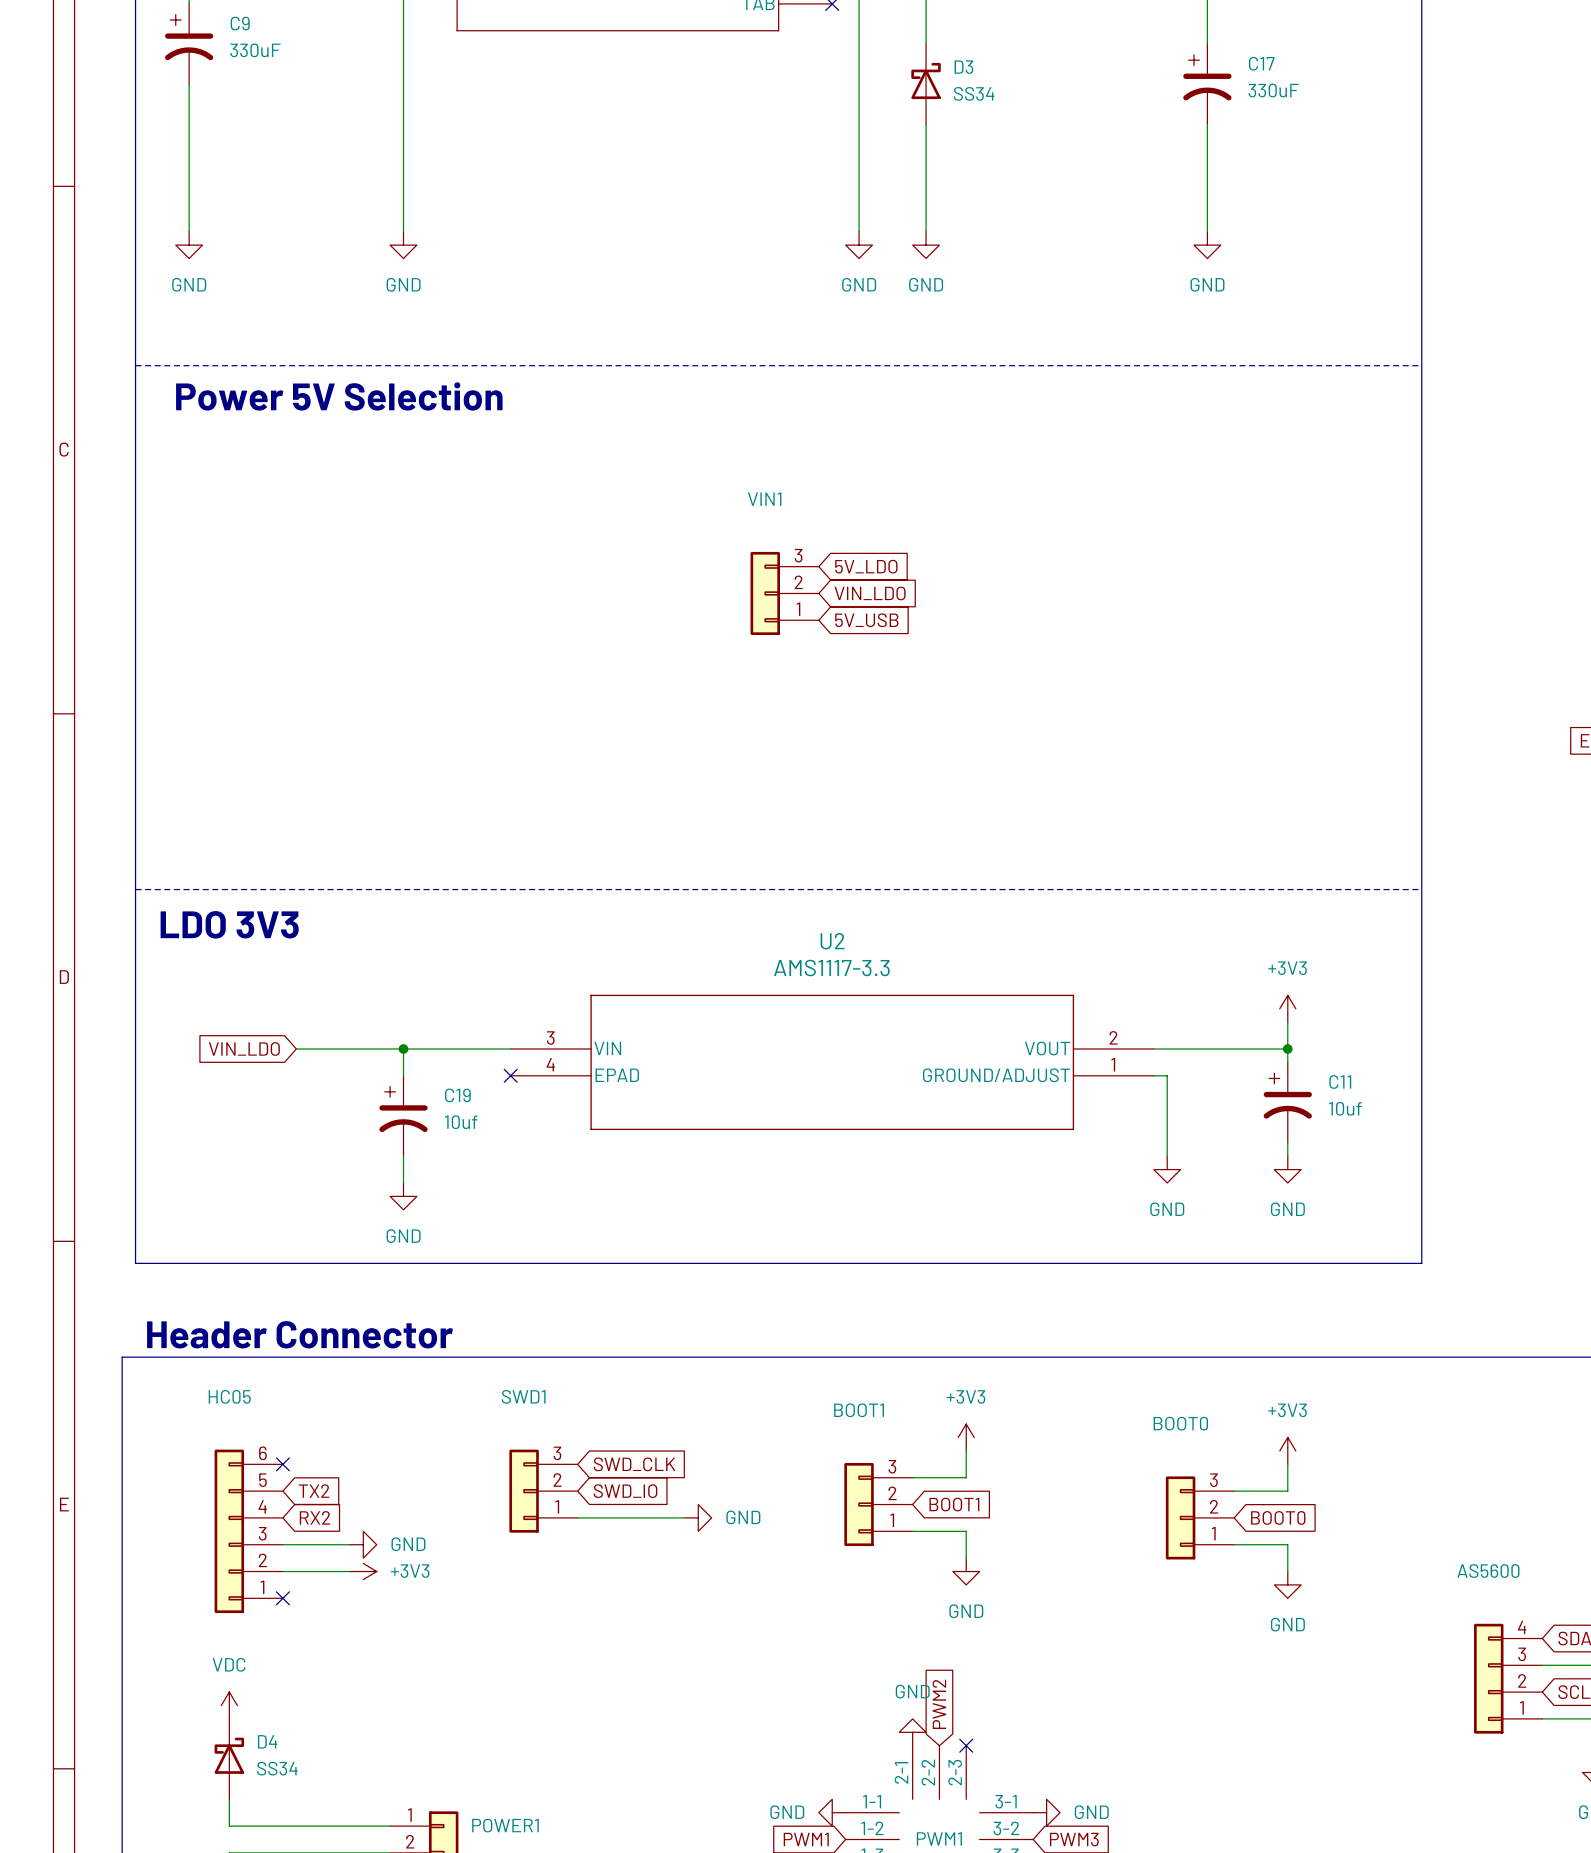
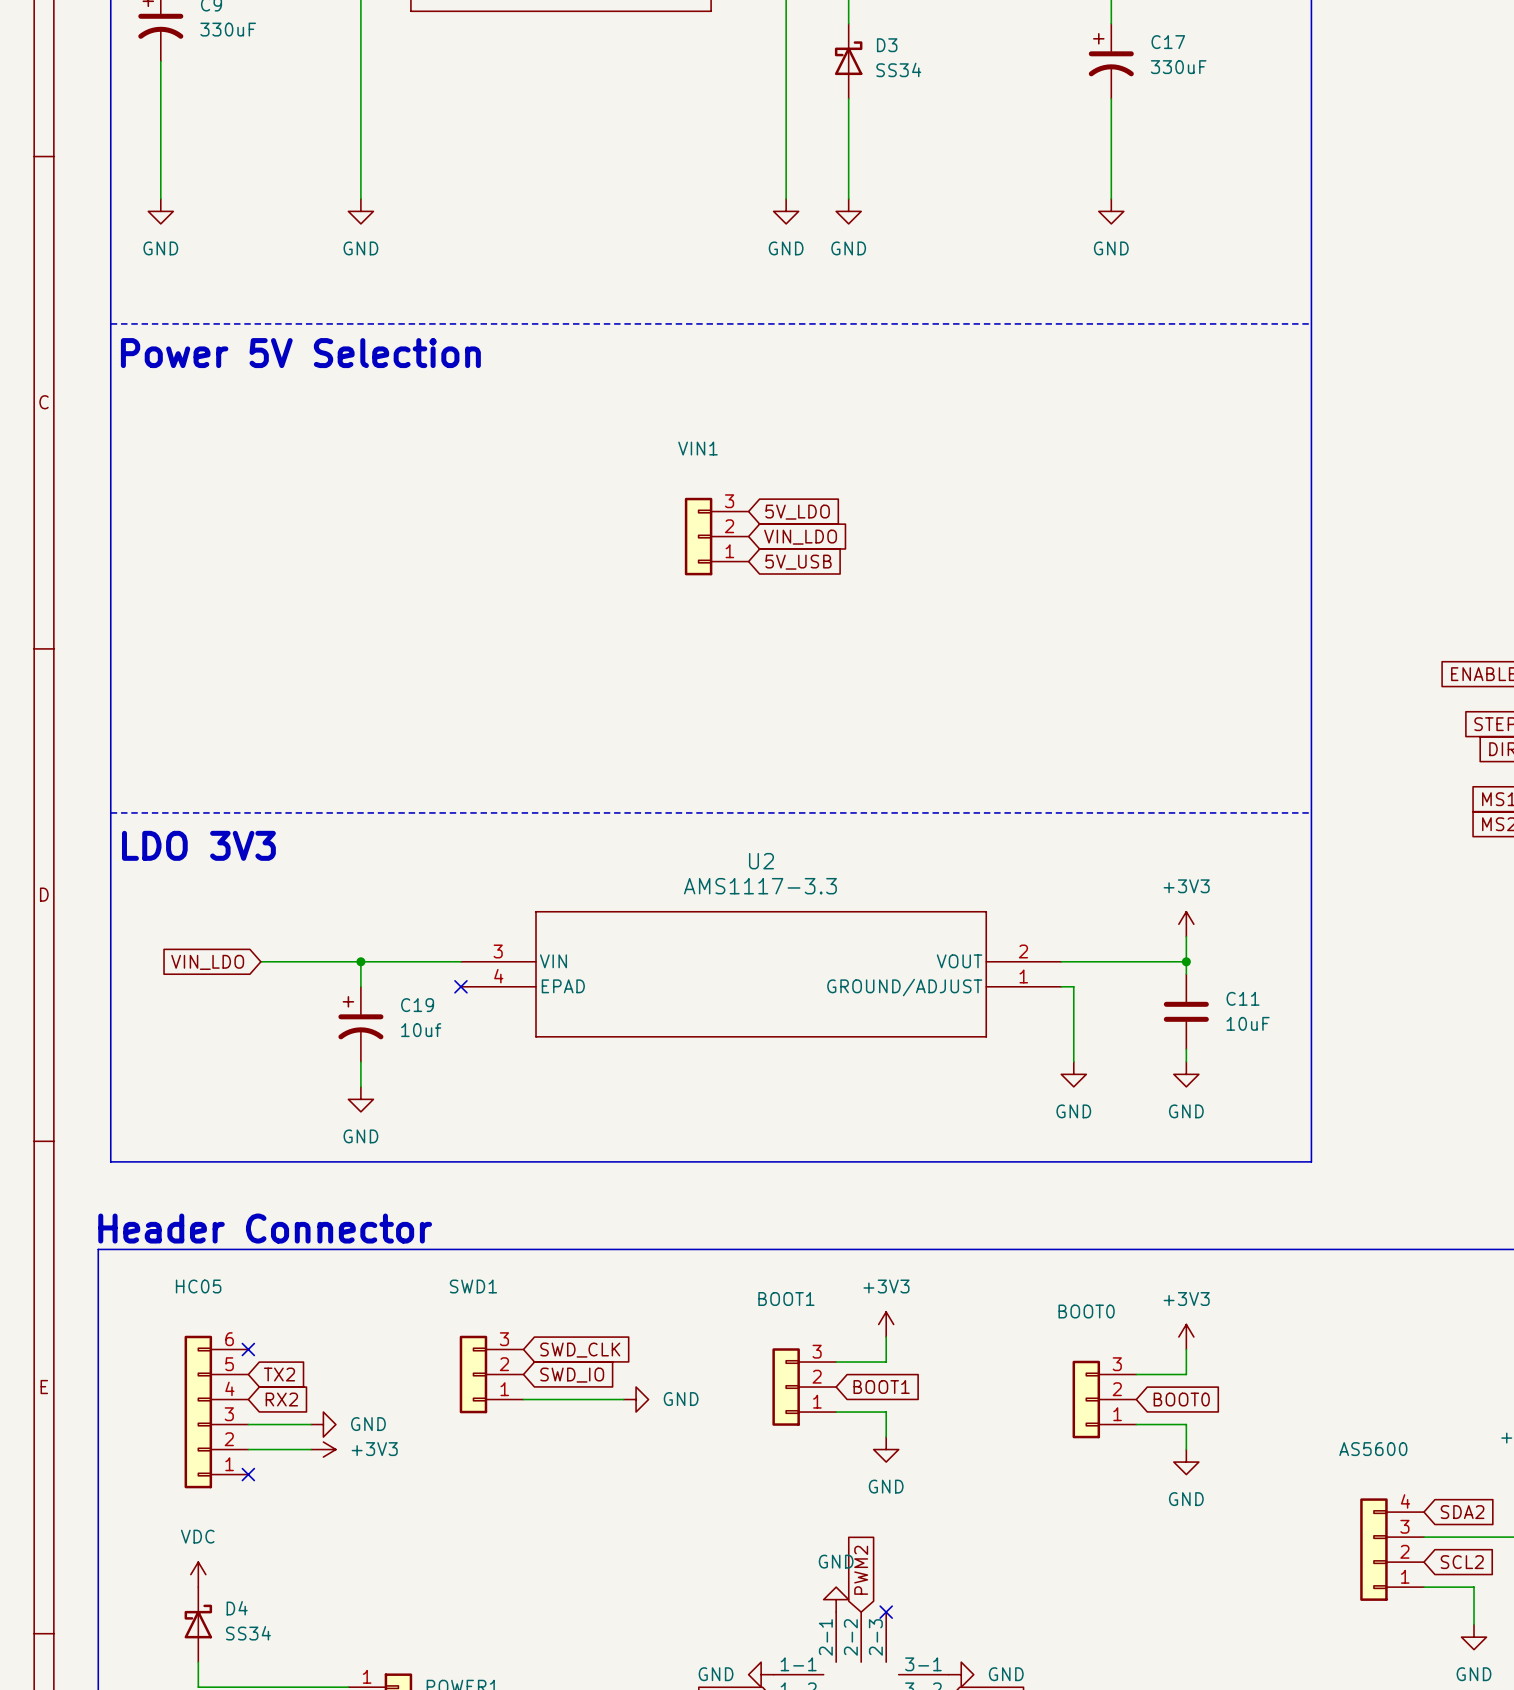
C11 symbol: [1263, 1062, 1312, 1143] -> [1163, 974, 1209, 1050]
C11 value: 10uf (1345, 1108) -> 10uF (1248, 1023)

